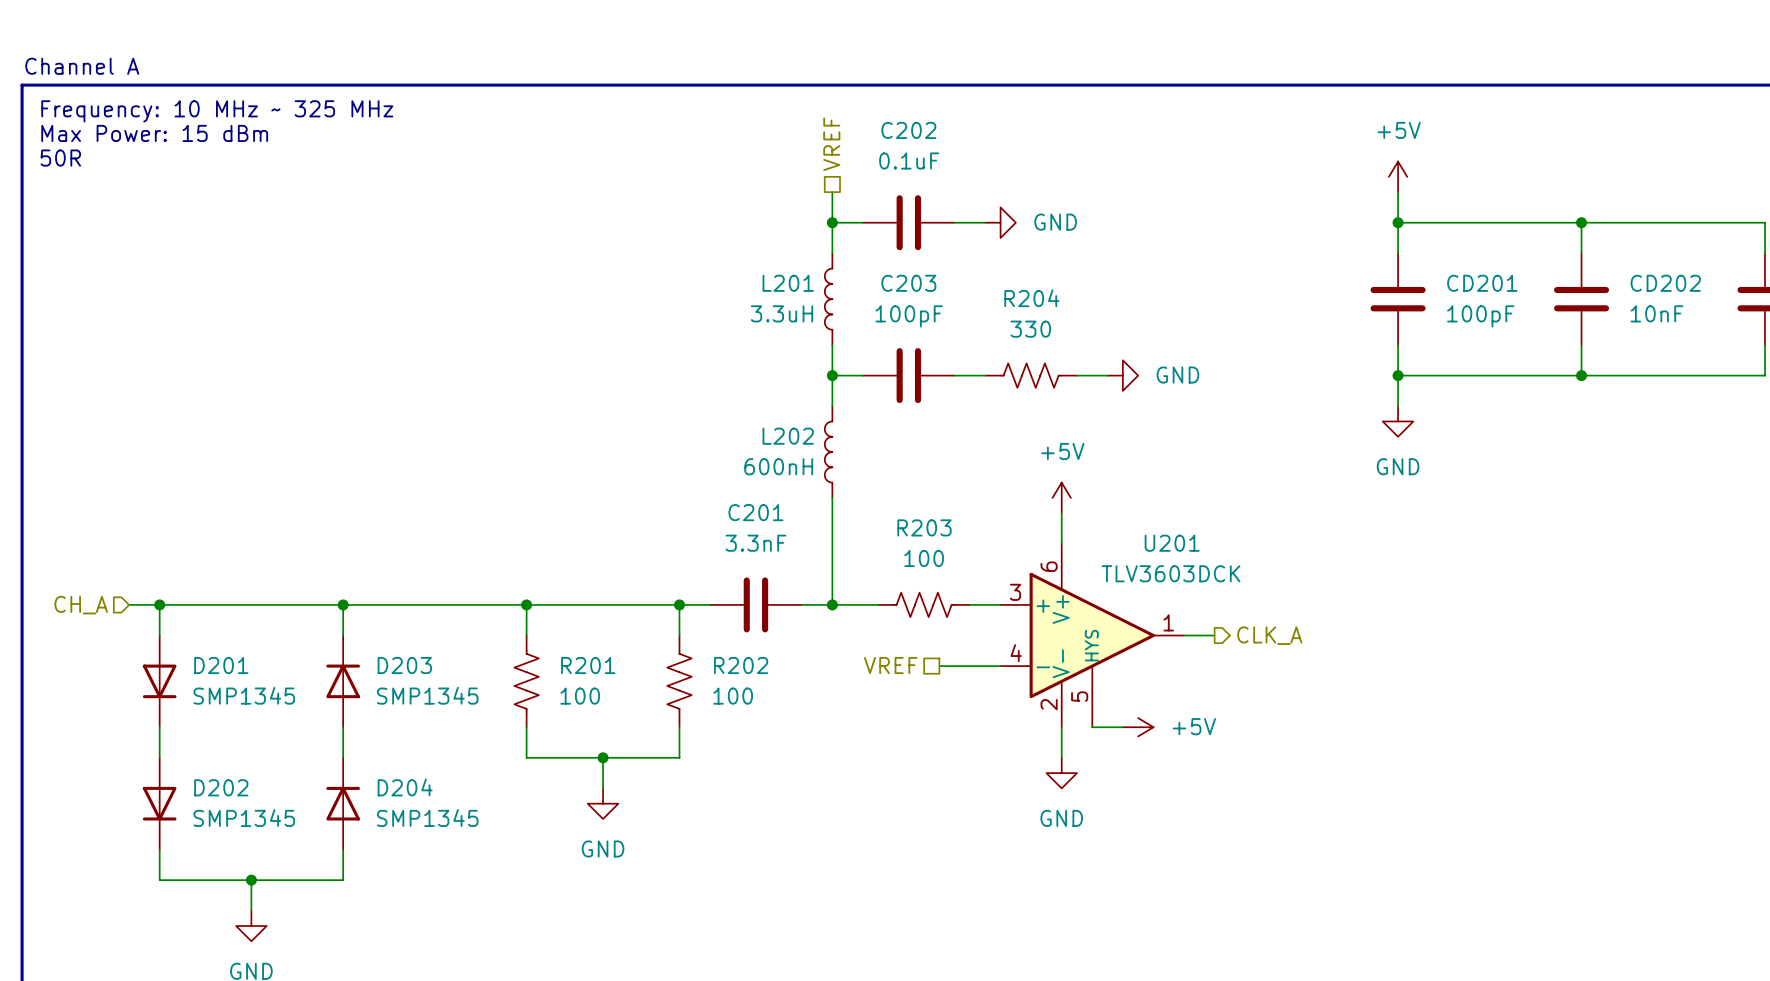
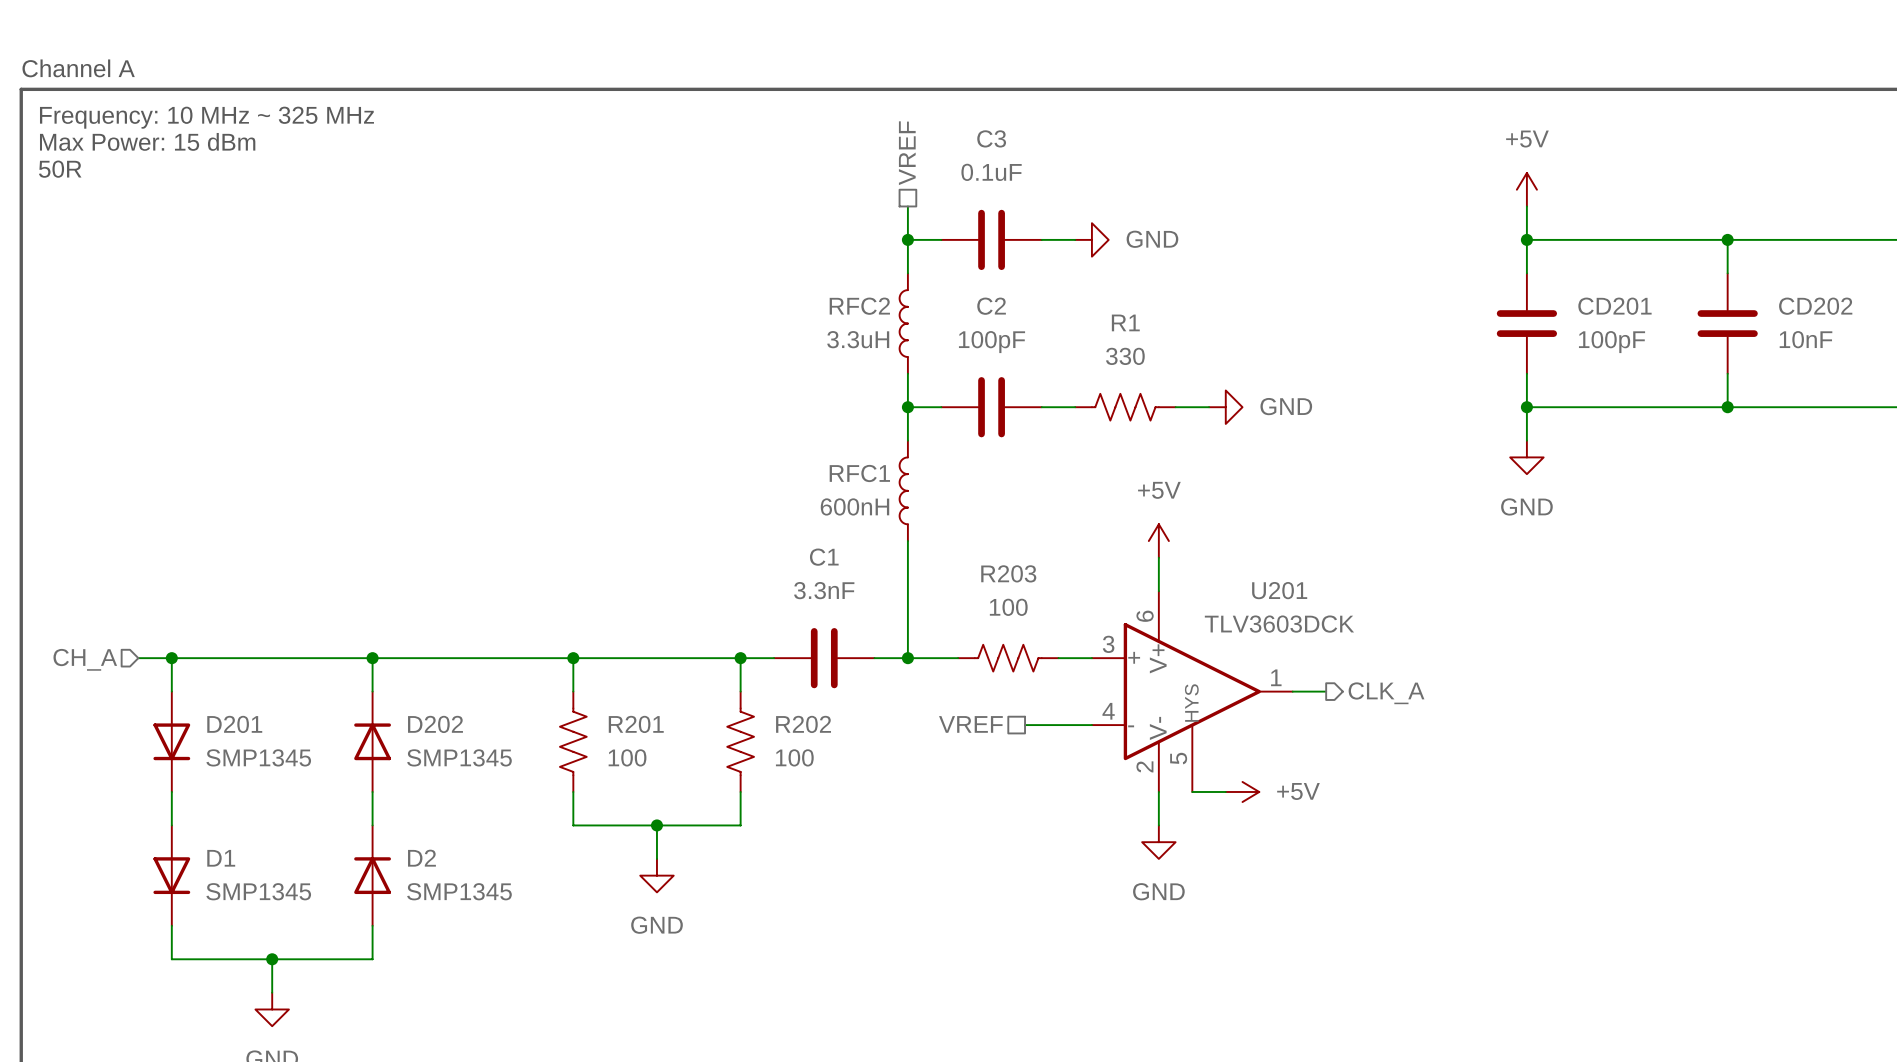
C202 name: C202 (908, 130) -> C3 (991, 138)
L201 name: L201 (788, 283) -> RFC2 (859, 306)
C203 name: C203 (908, 283) -> C2 (991, 306)
R204 name: R204 (1031, 298) -> R1 (1125, 322)
L202 name: L202 (788, 436) -> RFC1 (859, 473)
C201 name: C201 (755, 512) -> C1 (824, 557)
D203 name: D203 (404, 665) -> D202 (435, 724)
D202 name: D202 (221, 787) -> D1 (221, 858)
D204 name: D204 (405, 787) -> D2 (421, 858)

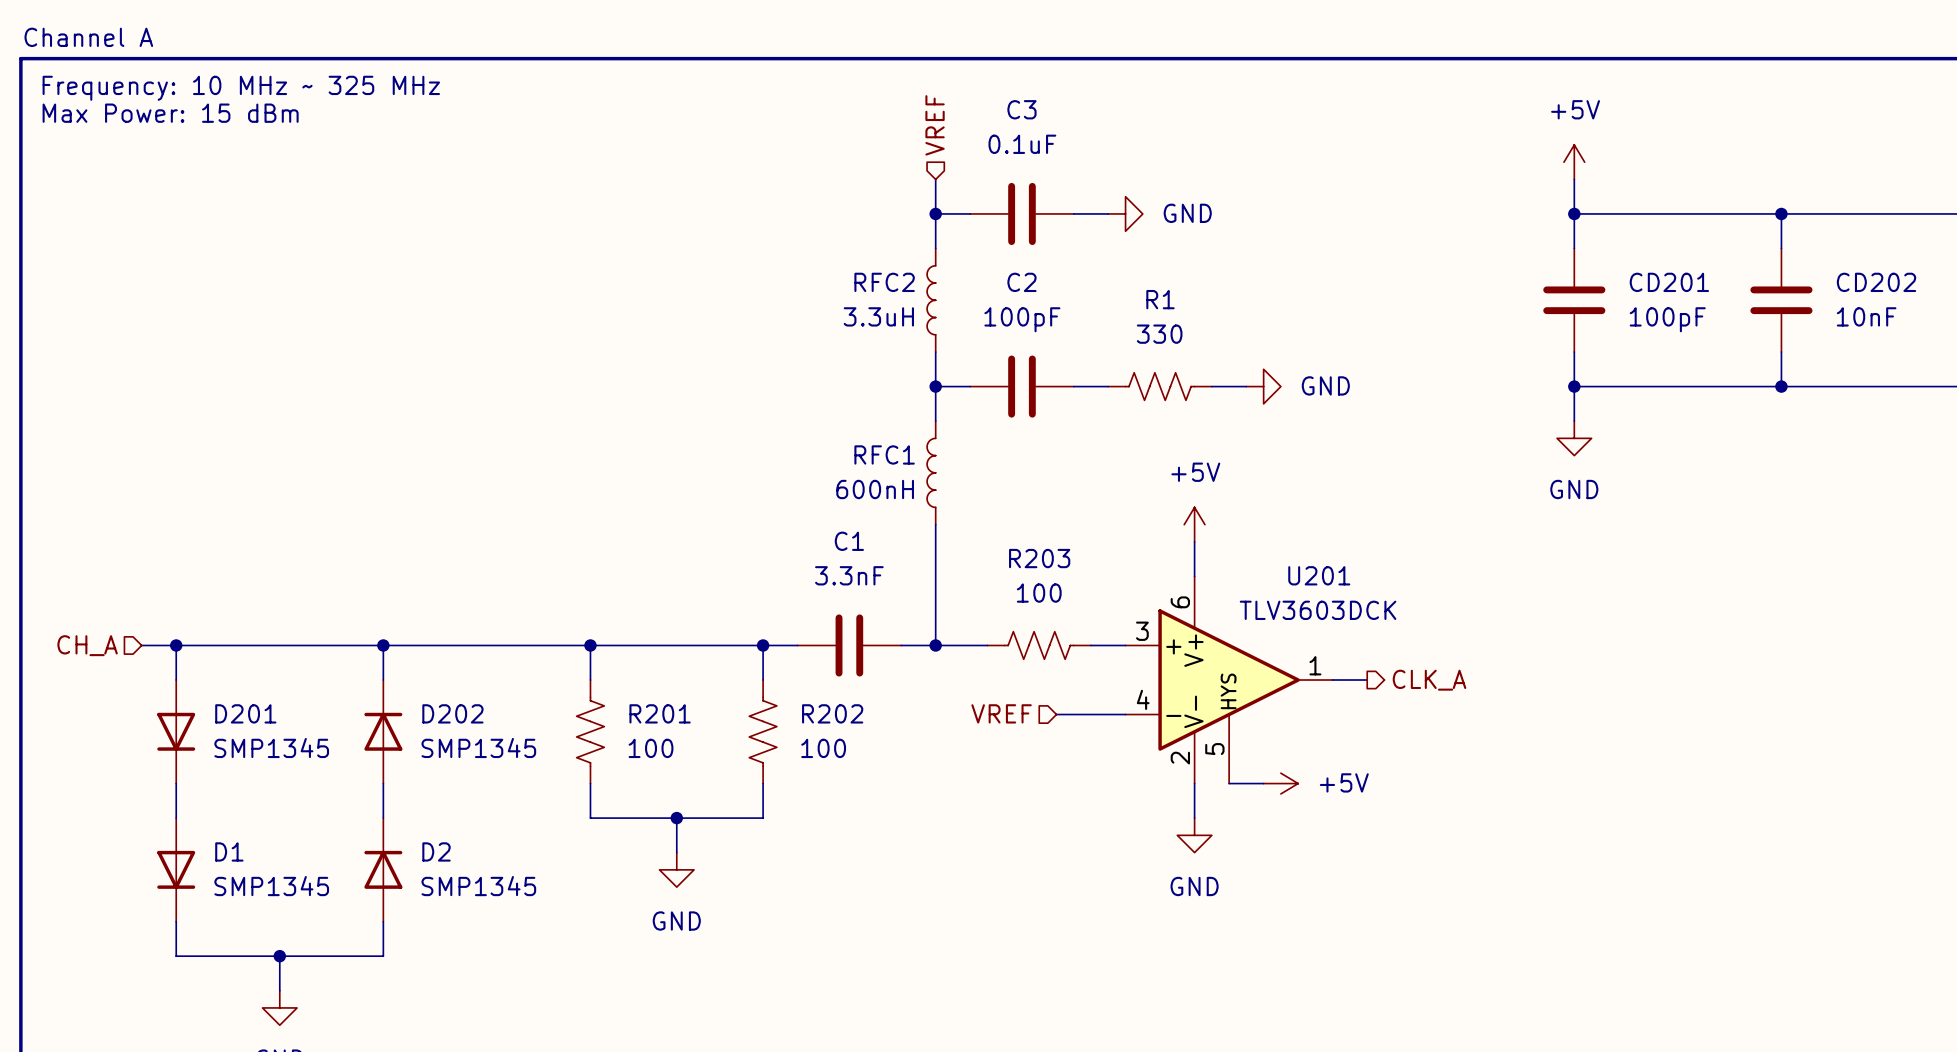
hierarchical label shape: passive (907, 153) -> input (935, 125)
text: 50R (60, 169) -> none
hierarchical label shape: passive (970, 724) -> input (1001, 713)

